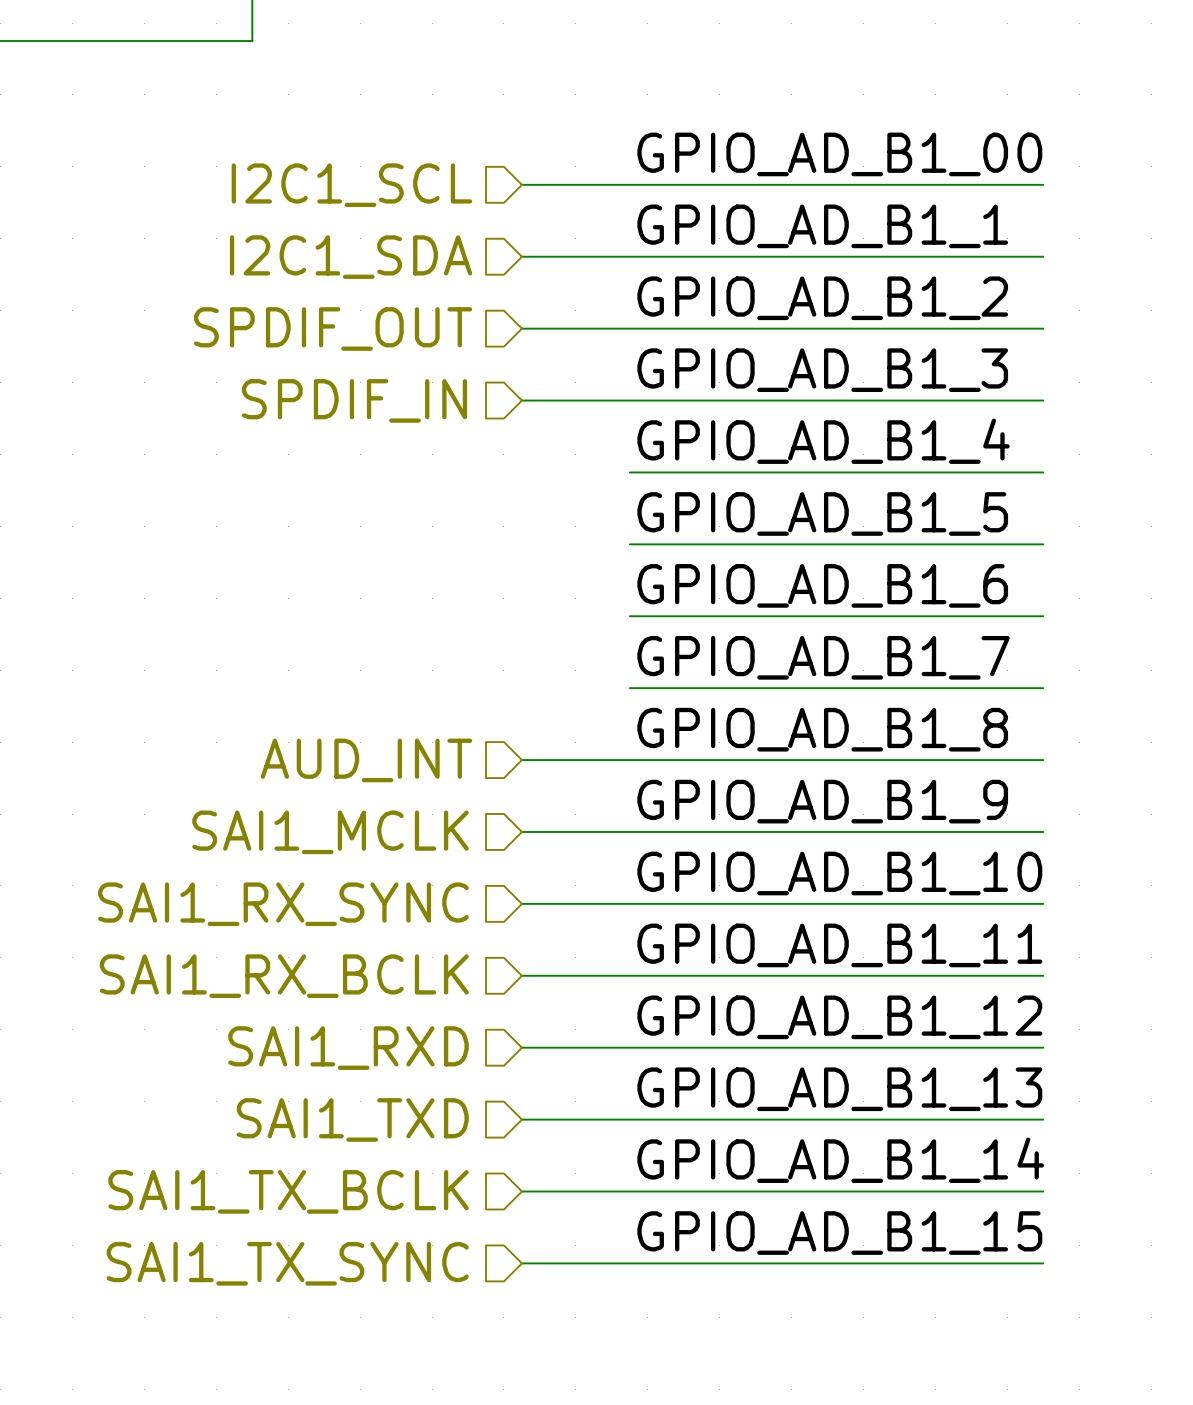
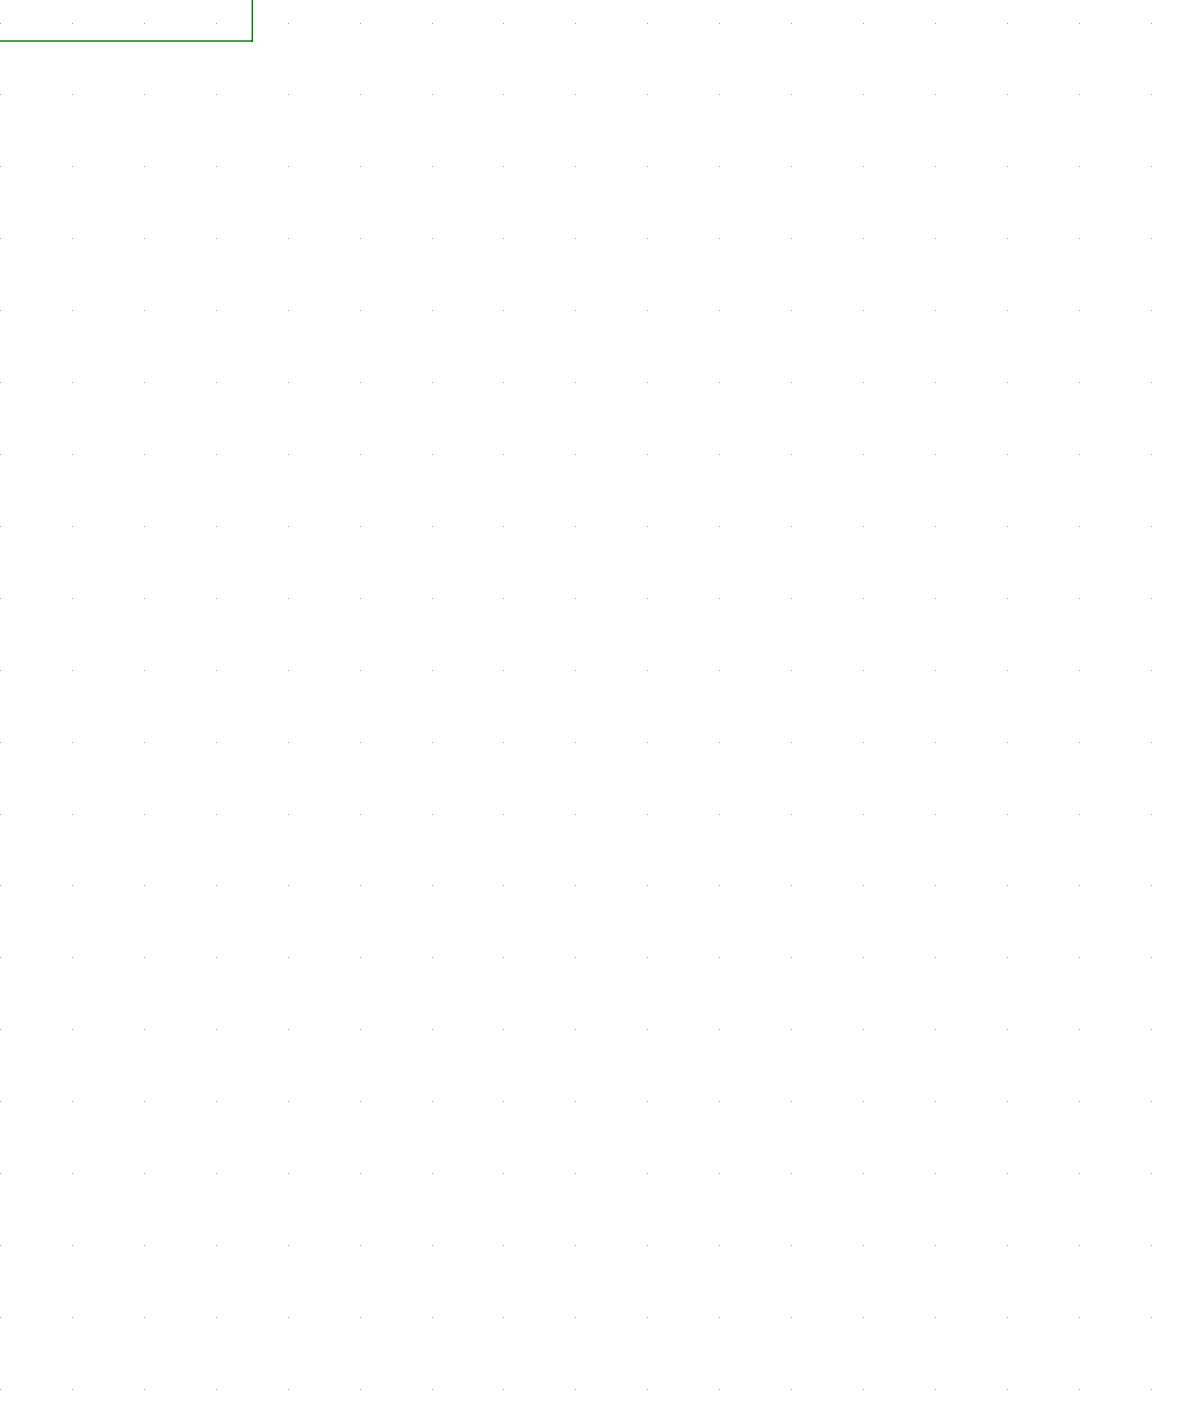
label: GPIO_AD_B1_00 (839, 154) -> none
wire: (521, 184) (1043, 184) -> none
hierarchical label: I2C1_SCL (351, 185) -> none
label: GPIO_AD_B1_1 (822, 226) -> none
wire: (521, 256) (1043, 256) -> none
hierarchical label: I2C1_SDA (351, 257) -> none
label: GPIO_AD_B1_2 (822, 298) -> none
wire: (521, 328) (1043, 328) -> none
hierarchical label: SPDIF_OUT (333, 329) -> none
label: GPIO_AD_B1_3 (822, 370) -> none
hierarchical label: SPDIF_IN (354, 400) -> none
wire: (521, 400) (1043, 400) -> none
label: GPIO_AD_B1_4 (823, 441) -> none
wire: (629, 472) (1043, 472) -> none
label: GPIO_AD_B1_5 (822, 513) -> none
wire: (629, 544) (1043, 544) -> none
label: GPIO_AD_B1_6 (822, 585) -> none
wire: (629, 616) (1043, 616) -> none
label: GPIO_AD_B1_7 (823, 657) -> none
wire: (629, 688) (1043, 688) -> none
label: GPIO_AD_B1_8 (822, 729) -> none
hierarchical label: AUD_INT (366, 760) -> none
wire: (521, 760) (1043, 760) -> none
label: GPIO_AD_B1_9 (822, 801) -> none
wire: (521, 831) (1043, 831) -> none
hierarchical label: SAI1_MCLK (330, 832) -> none
label: GPIO_AD_B1_10 (839, 873) -> none
wire: (521, 903) (1043, 903) -> none
hierarchical label: SAI1_RX_SYNC (283, 904) -> none
label: GPIO_AD_B1_11 (839, 945) -> none
wire: (521, 975) (1043, 975) -> none
hierarchical label: SAI1_RX_BCLK (284, 976) -> none
label: GPIO_AD_B1_12 (839, 1017) -> none
wire: (521, 1047) (1043, 1047) -> none
hierarchical label: SAI1_RXD (348, 1048) -> none
label: GPIO_AD_B1_13 (839, 1089) -> none
hierarchical label: SAI1_TXD (352, 1119) -> none
wire: (521, 1119) (1043, 1119) -> none
label: GPIO_AD_B1_14 (840, 1160) -> none
hierarchical label: SAI1_TX_BCLK (288, 1191) -> none
wire: (521, 1191) (1043, 1191) -> none
label: GPIO_AD_B1_15 (839, 1233) -> none
hierarchical label: SAI1_TX_SYNC (287, 1263) -> none
wire: (521, 1263) (1043, 1263) -> none

